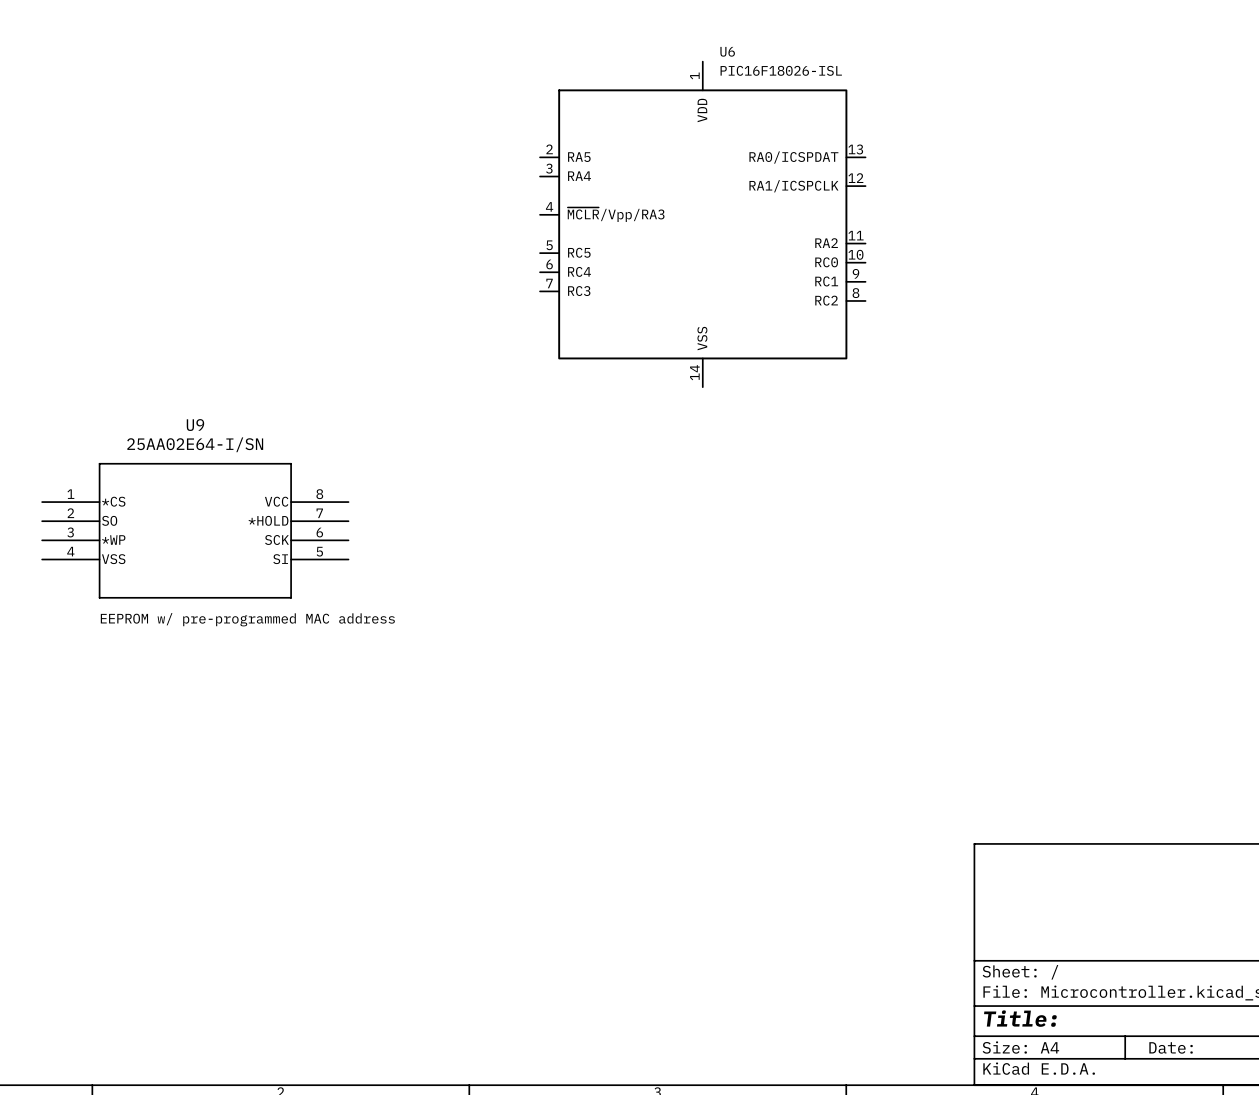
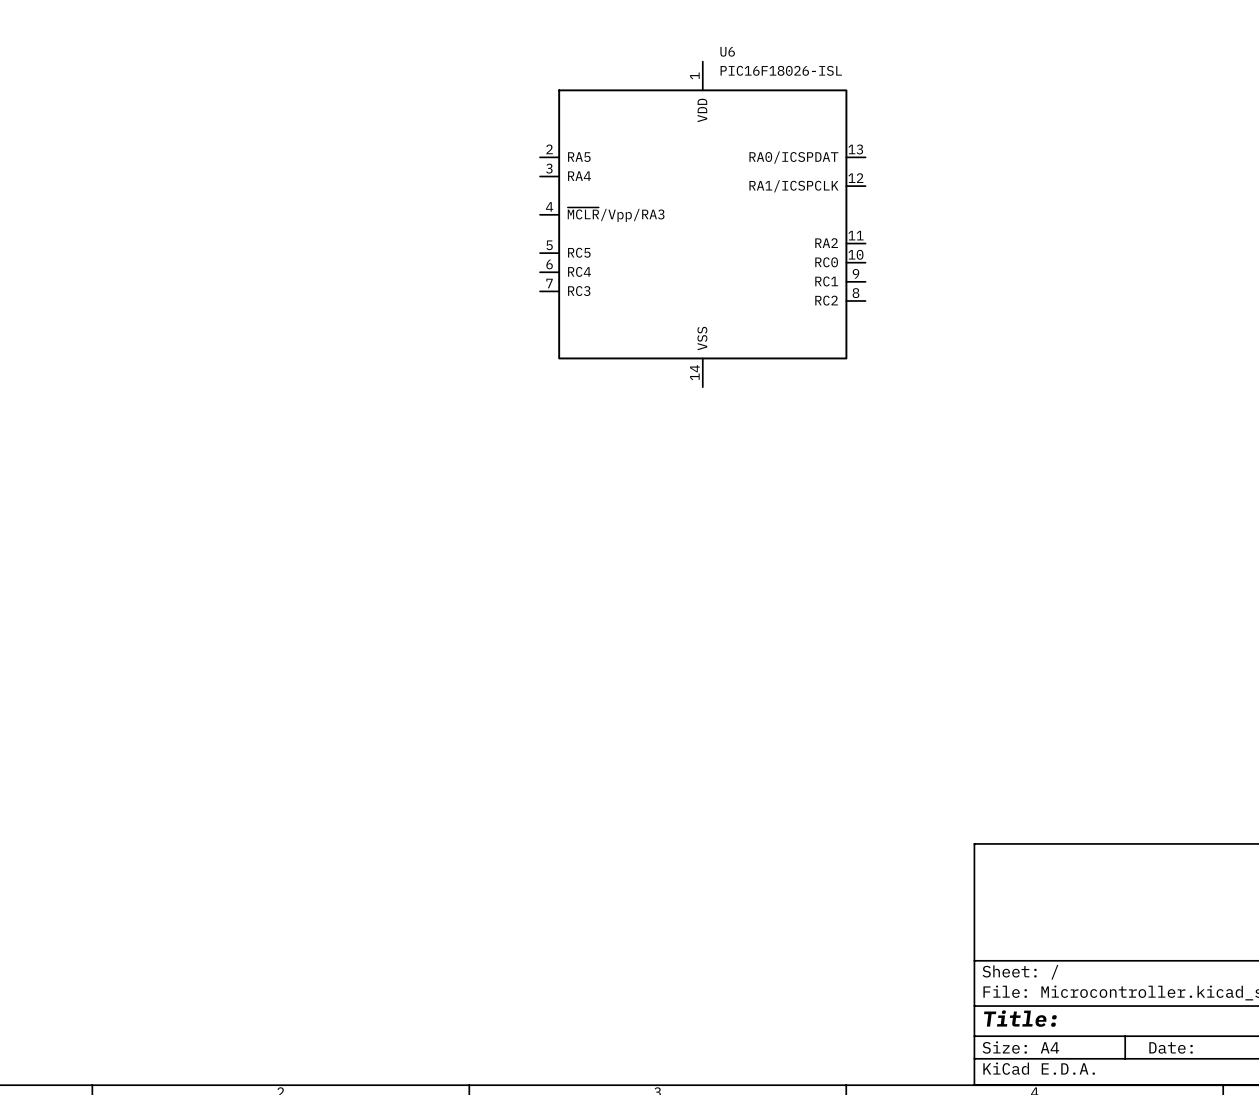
U9: 25AA02E64-I/SN (195, 530) -> none
text: EEPROM w/ pre-programmed MAC address (247, 619) -> none

